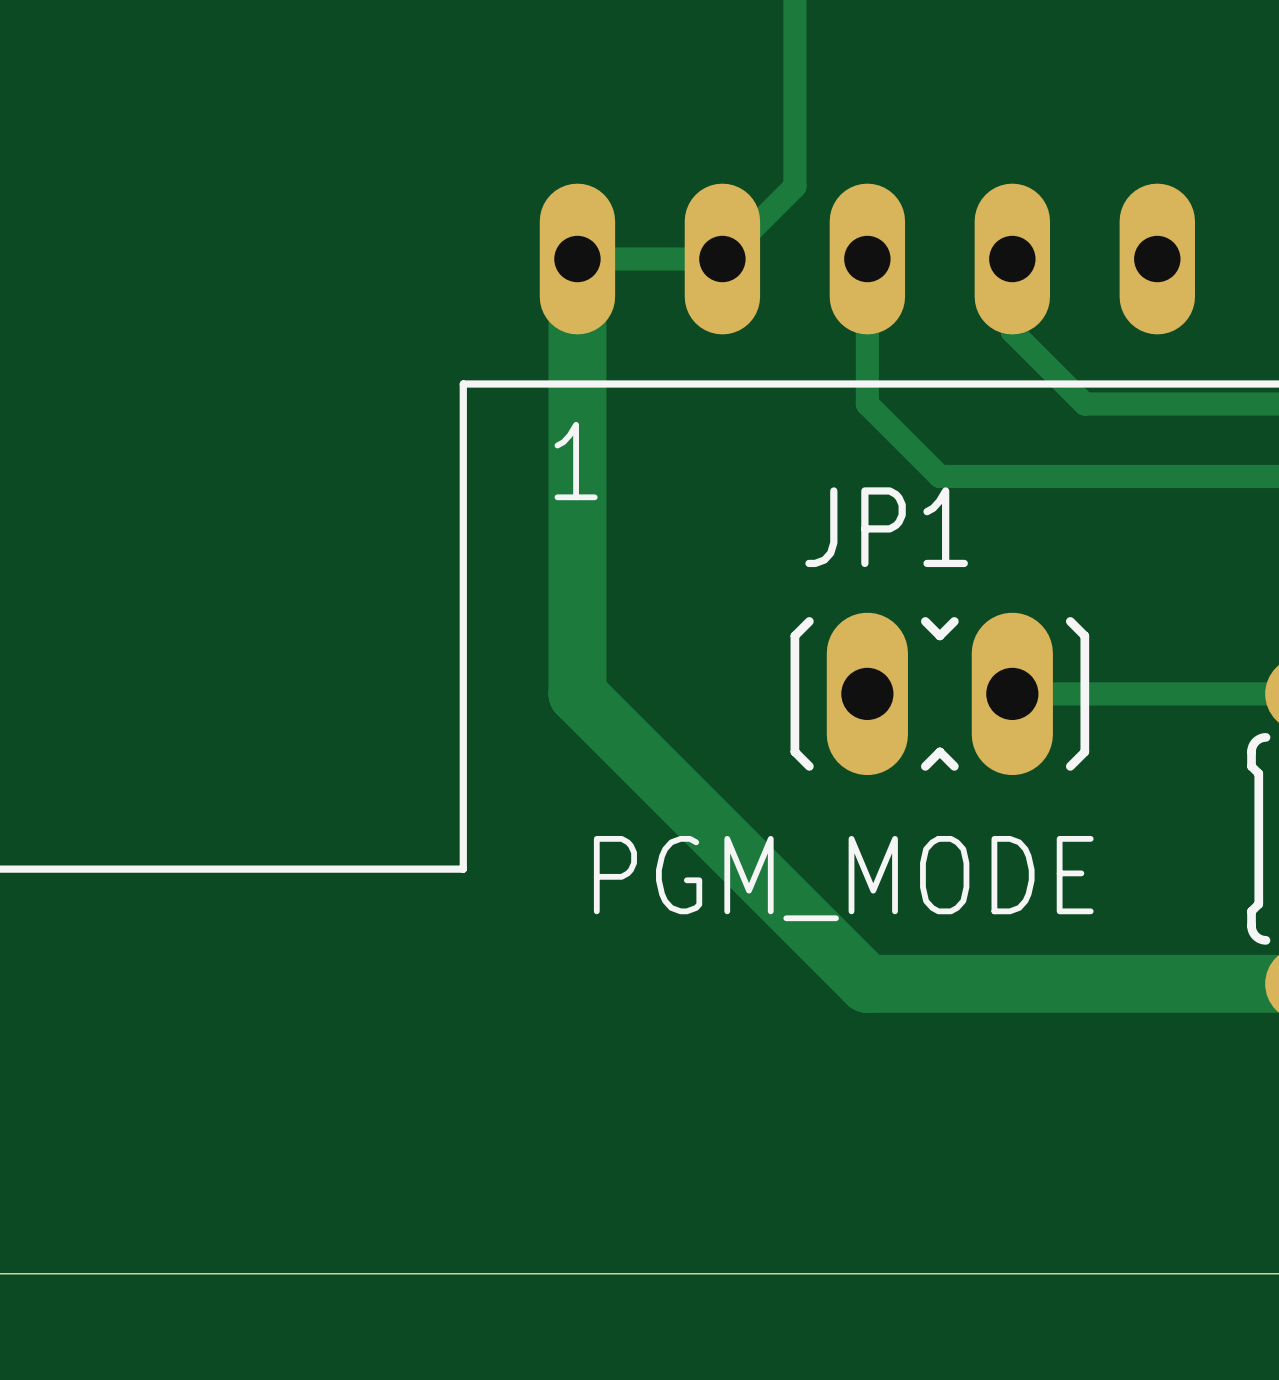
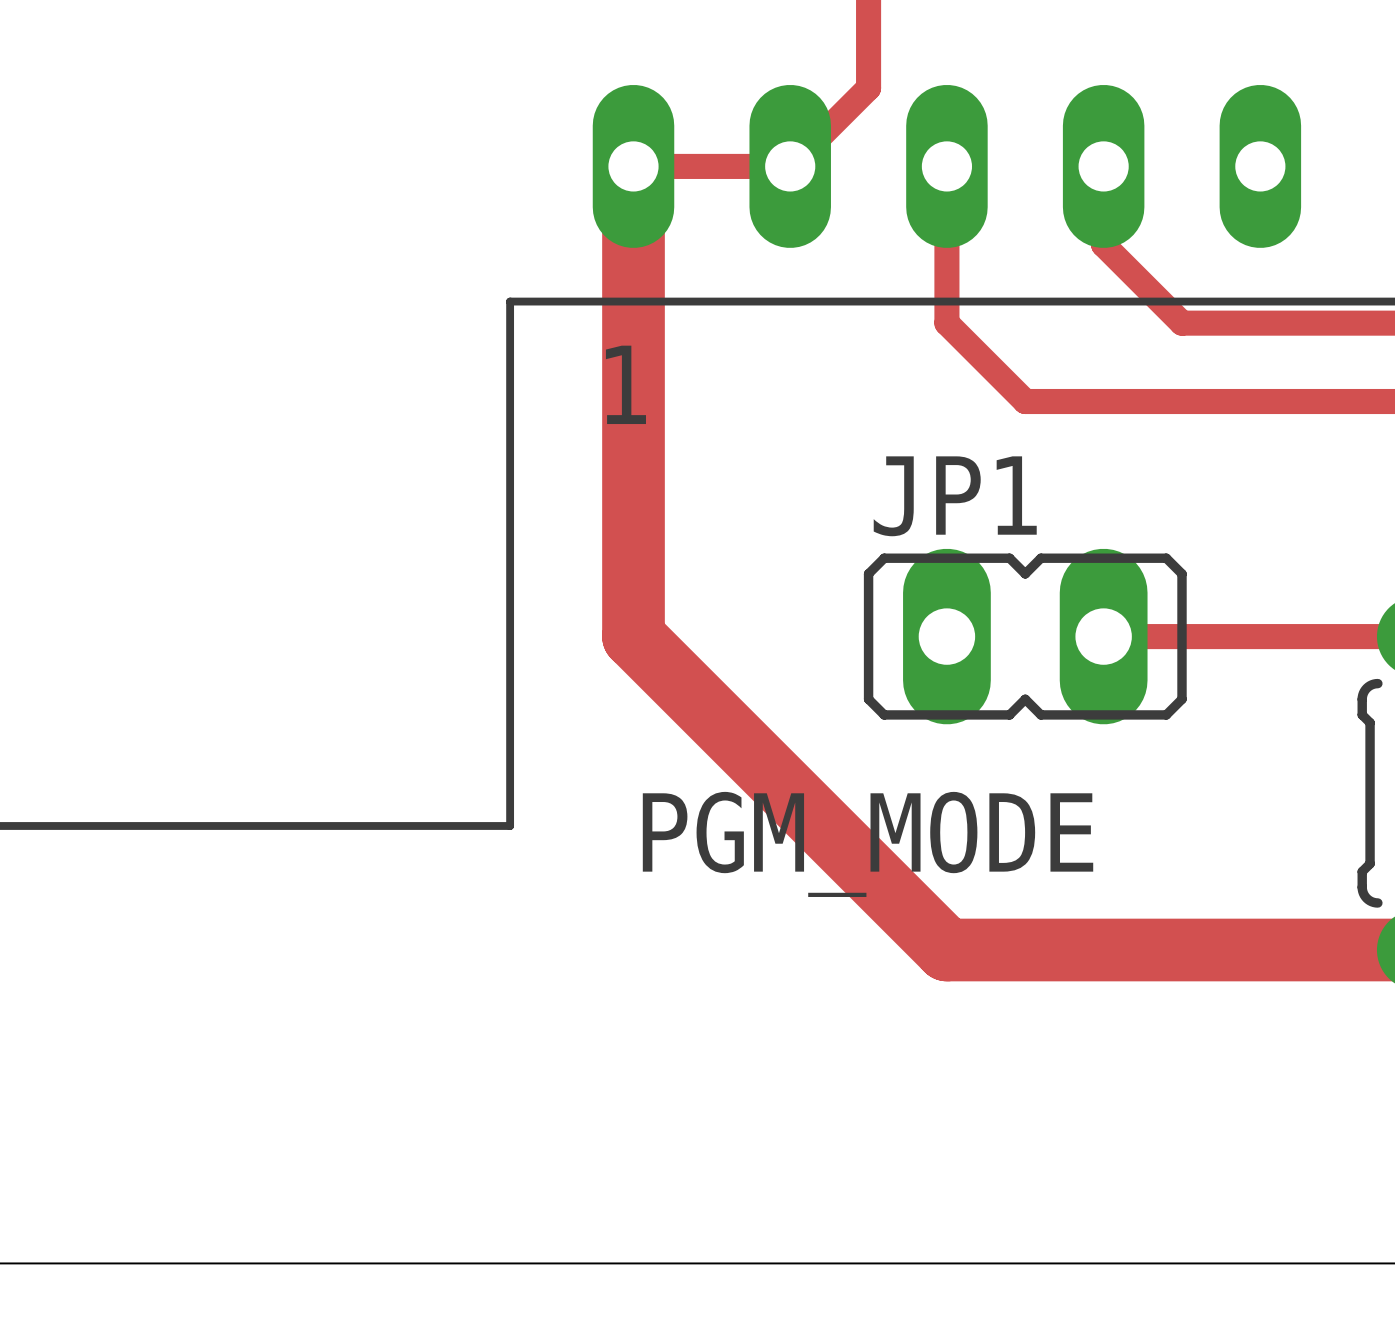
JP1 name position: JP1 (886, 527) -> JP1 (955, 496)
JP1 footprint: [790, 612, 1090, 776] -> [863, 548, 1187, 725]

